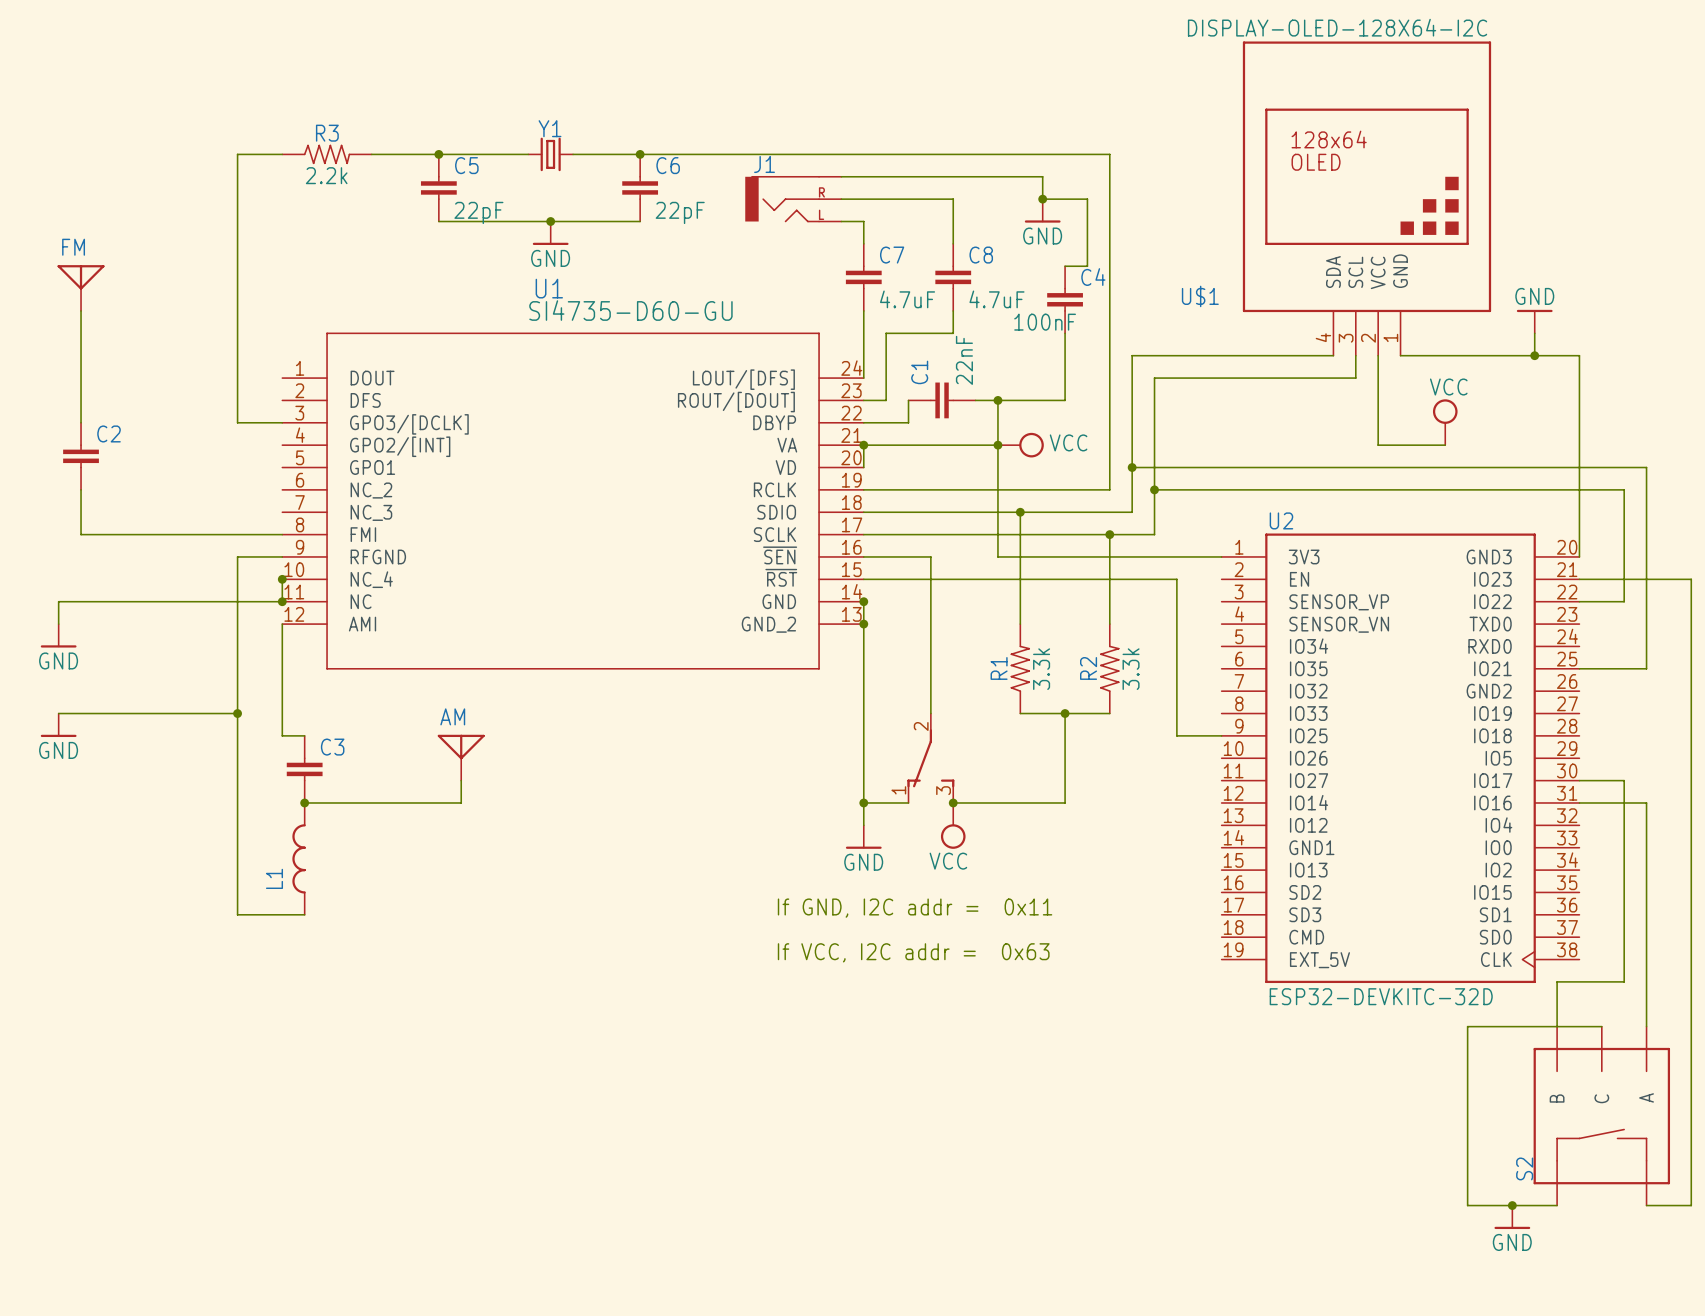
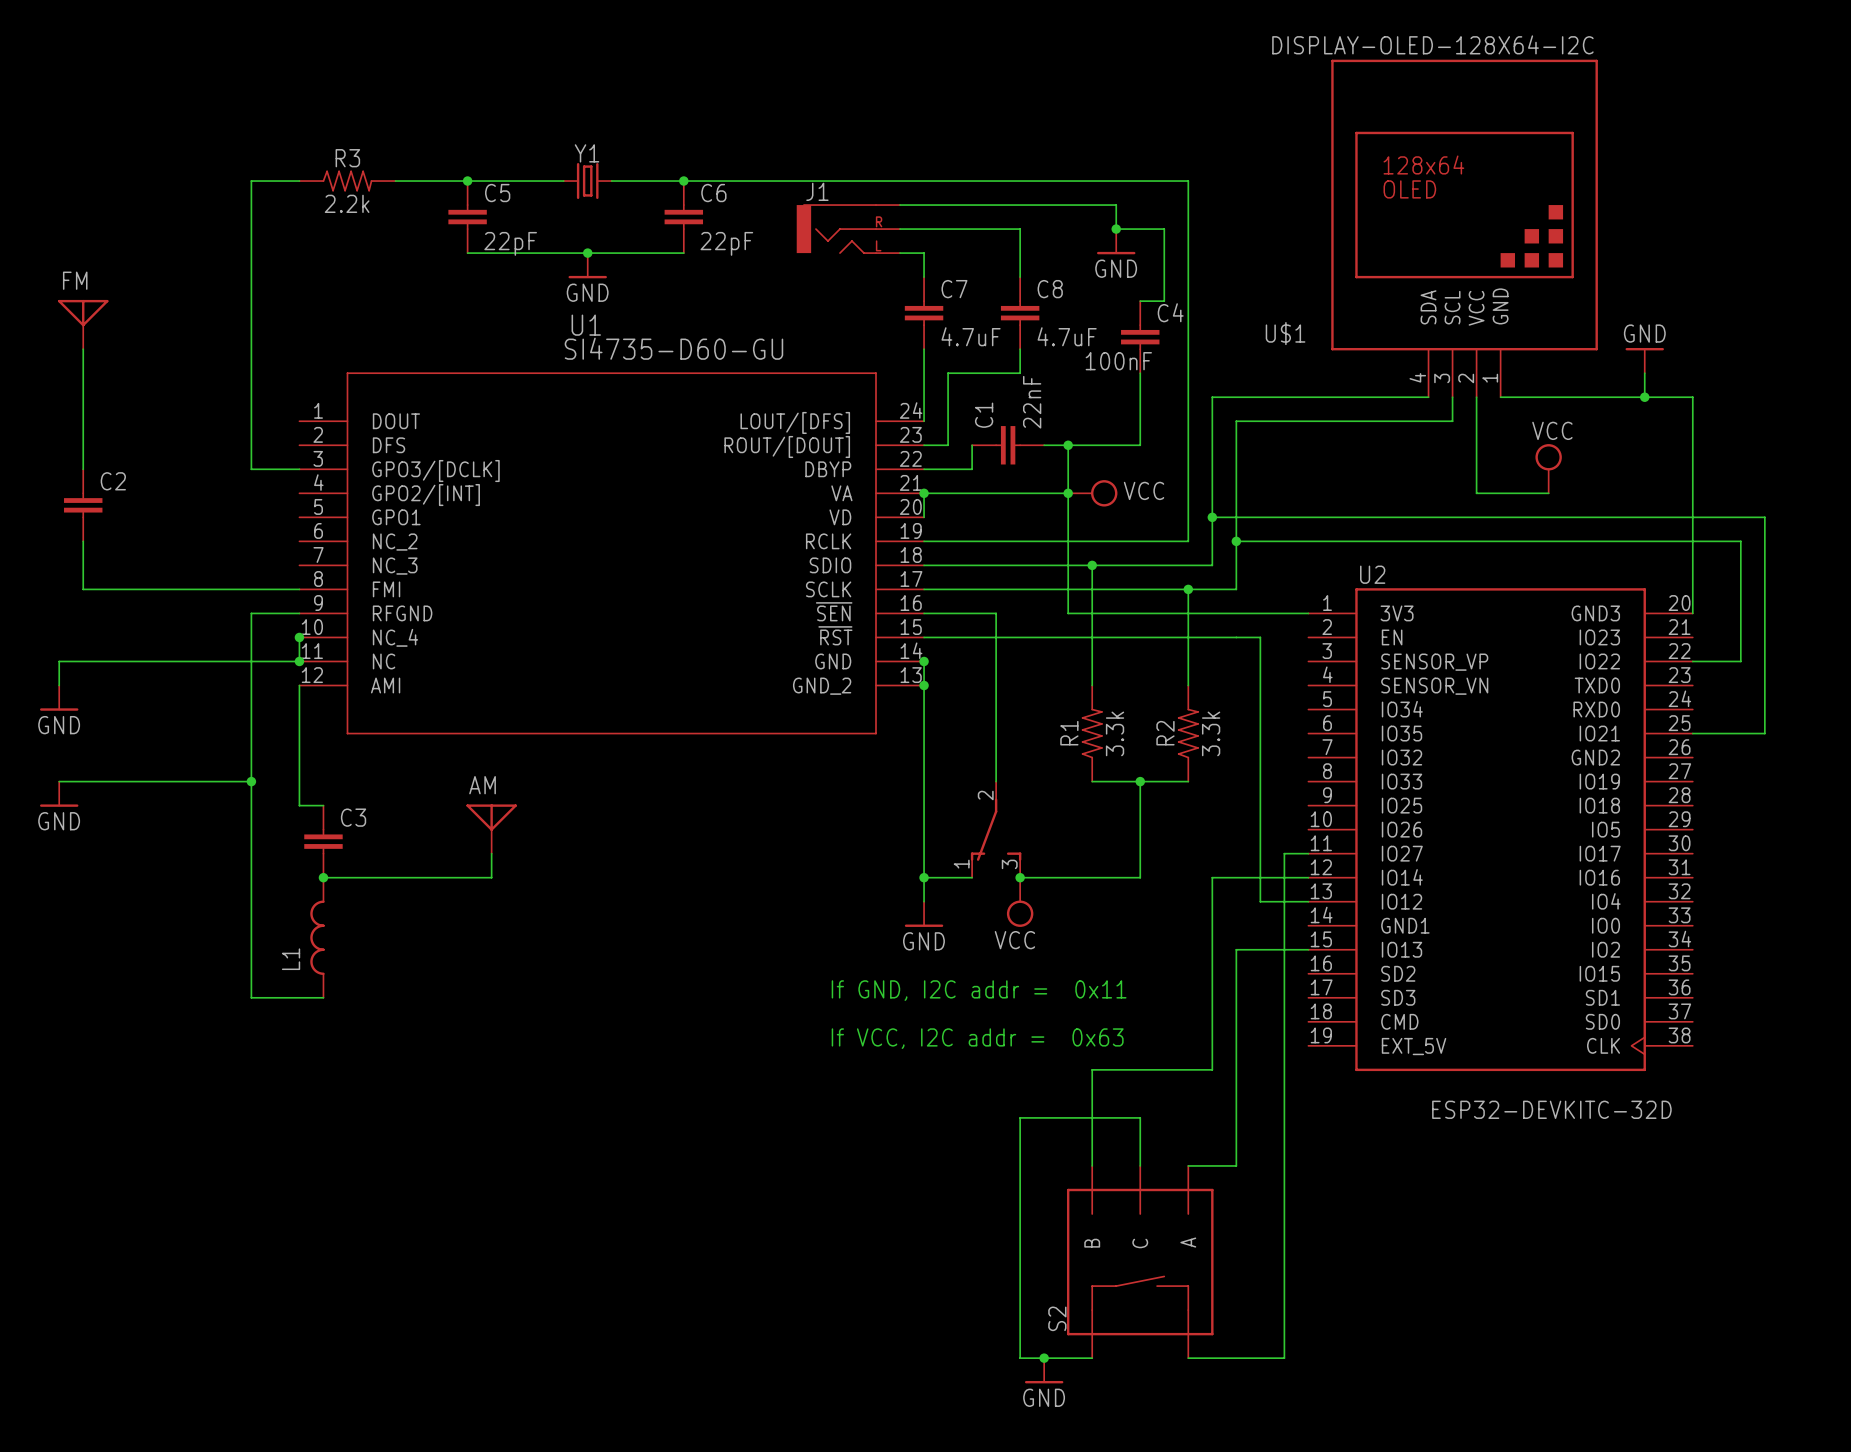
wire: (1579, 579) (1691, 579) (1691, 1205) (1646, 1205) -> none
wire: (1176, 735) (1221, 735) -> (1260, 805) (1260, 901) (1308, 901)
wire: none -> (1308, 853) (1284, 853) (1284, 1358) (1188, 1358)
wire: (1579, 780) (1624, 780) (1624, 981) (1557, 981) (1557, 1026) -> none
wire: none -> (1308, 877) (1212, 877) (1212, 1069) (1092, 1069) (1092, 1165)
wire: (1579, 802) (1646, 802) (1646, 1026) -> none
wire: none -> (1308, 949) (1236, 949) (1236, 1165) (1188, 1165)
U2 value position: ESP32-DEVKITC-32D (1381, 996) -> ESP32-DEVKITC-32D (1551, 1109)
wire: (1601, 1026) (1467, 1026) (1467, 1205) (1557, 1205) -> none
wire: none -> (1140, 1165) (1140, 1117) (1020, 1117) (1020, 1358) (1092, 1358)
S2 position: (1601, 1116) -> (1140, 1262)
junction: (1512, 1205) -> none
power symbol: GND (1512, 1217) -> none
junction: none -> (1044, 1358)
power symbol: none -> GND (1044, 1370)

